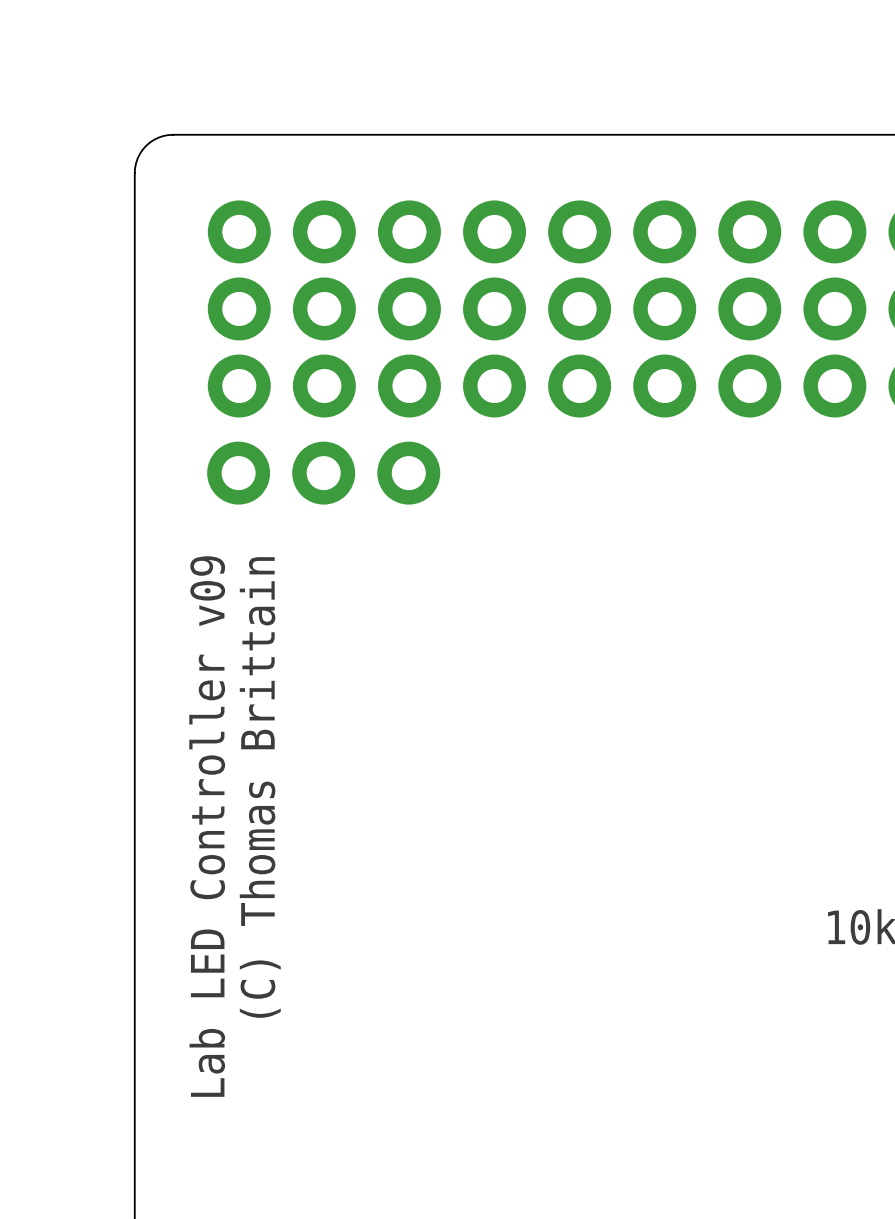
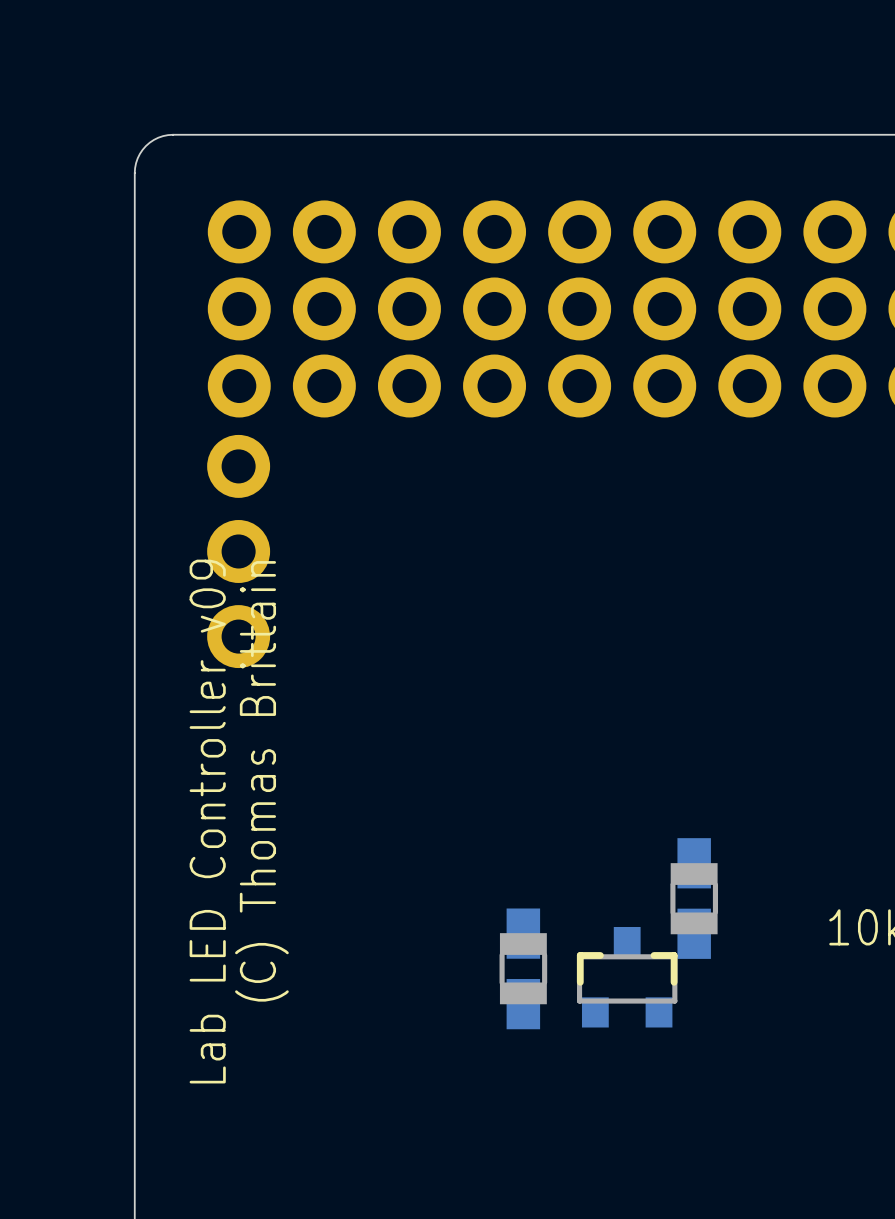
part rotation: 0° (323, 473) -> 90° clockwise (238, 551)
part: none -> (694, 898)
part: none -> (523, 968)
part: none -> (627, 977)

